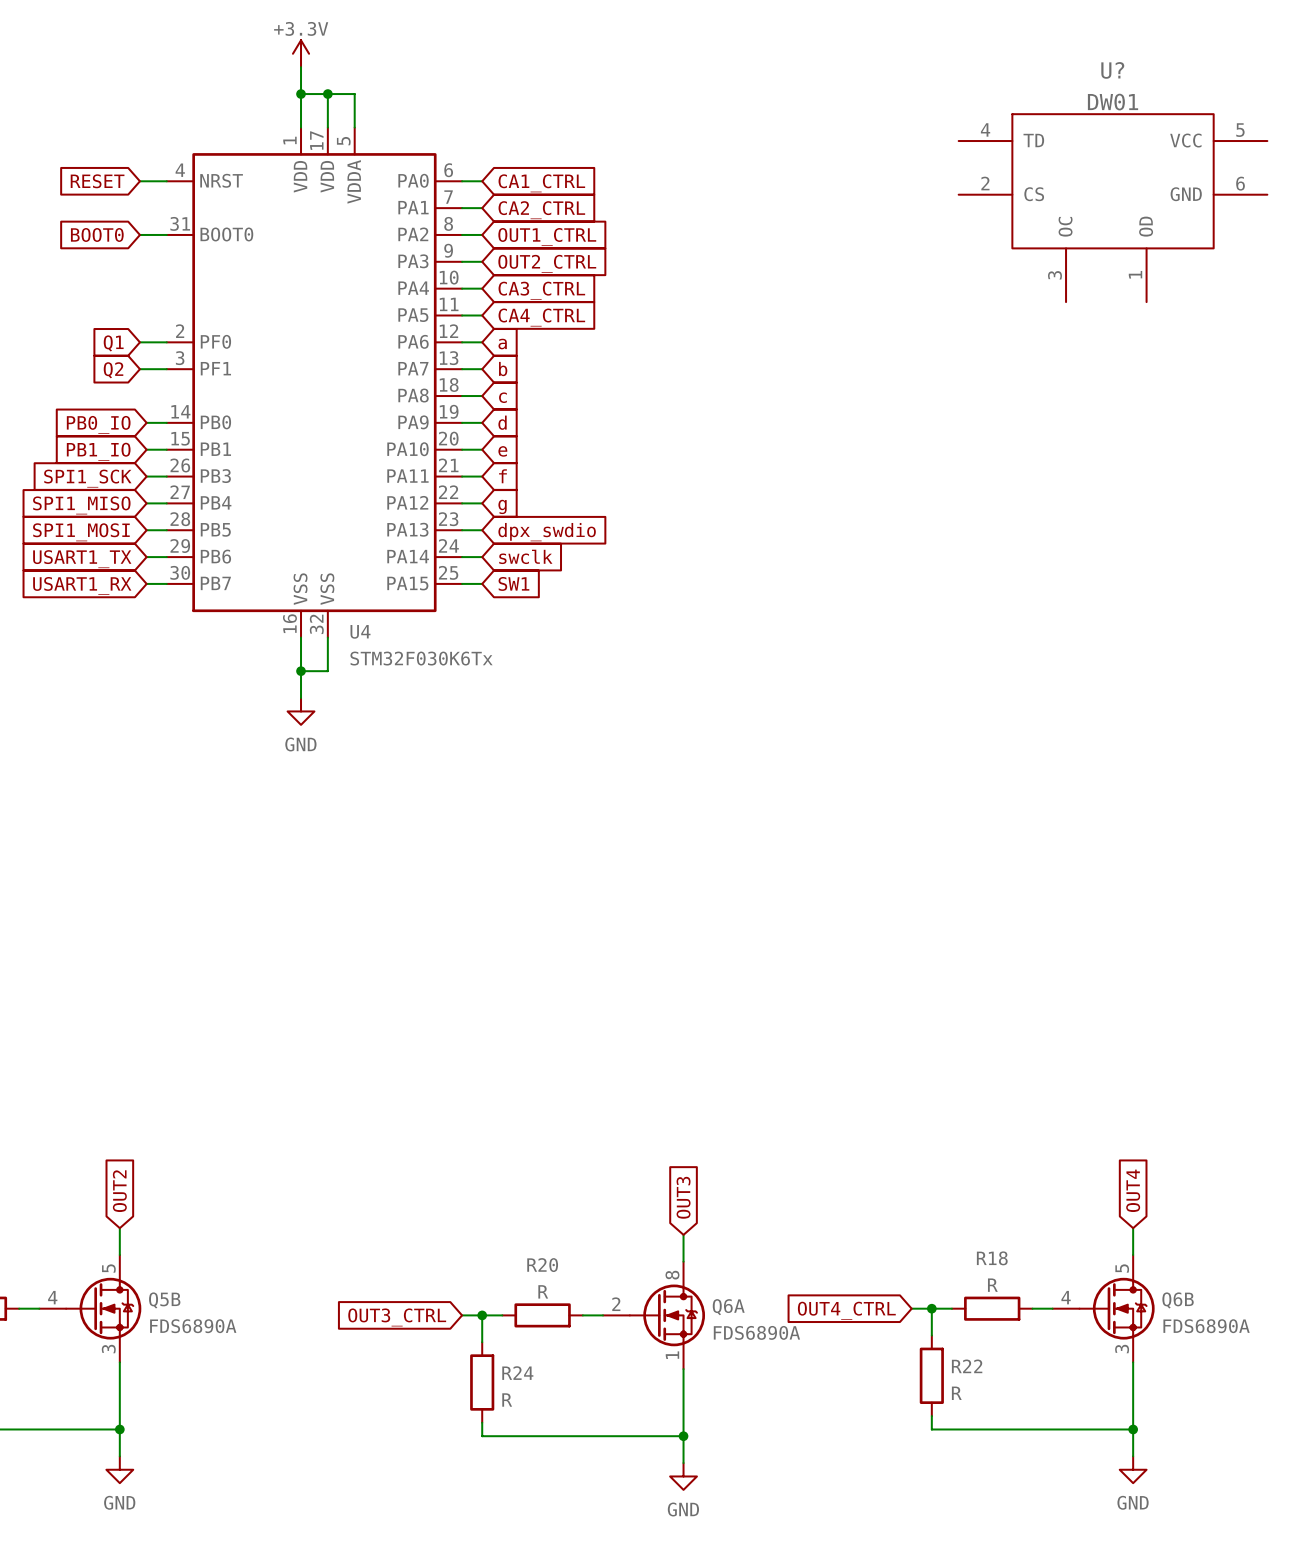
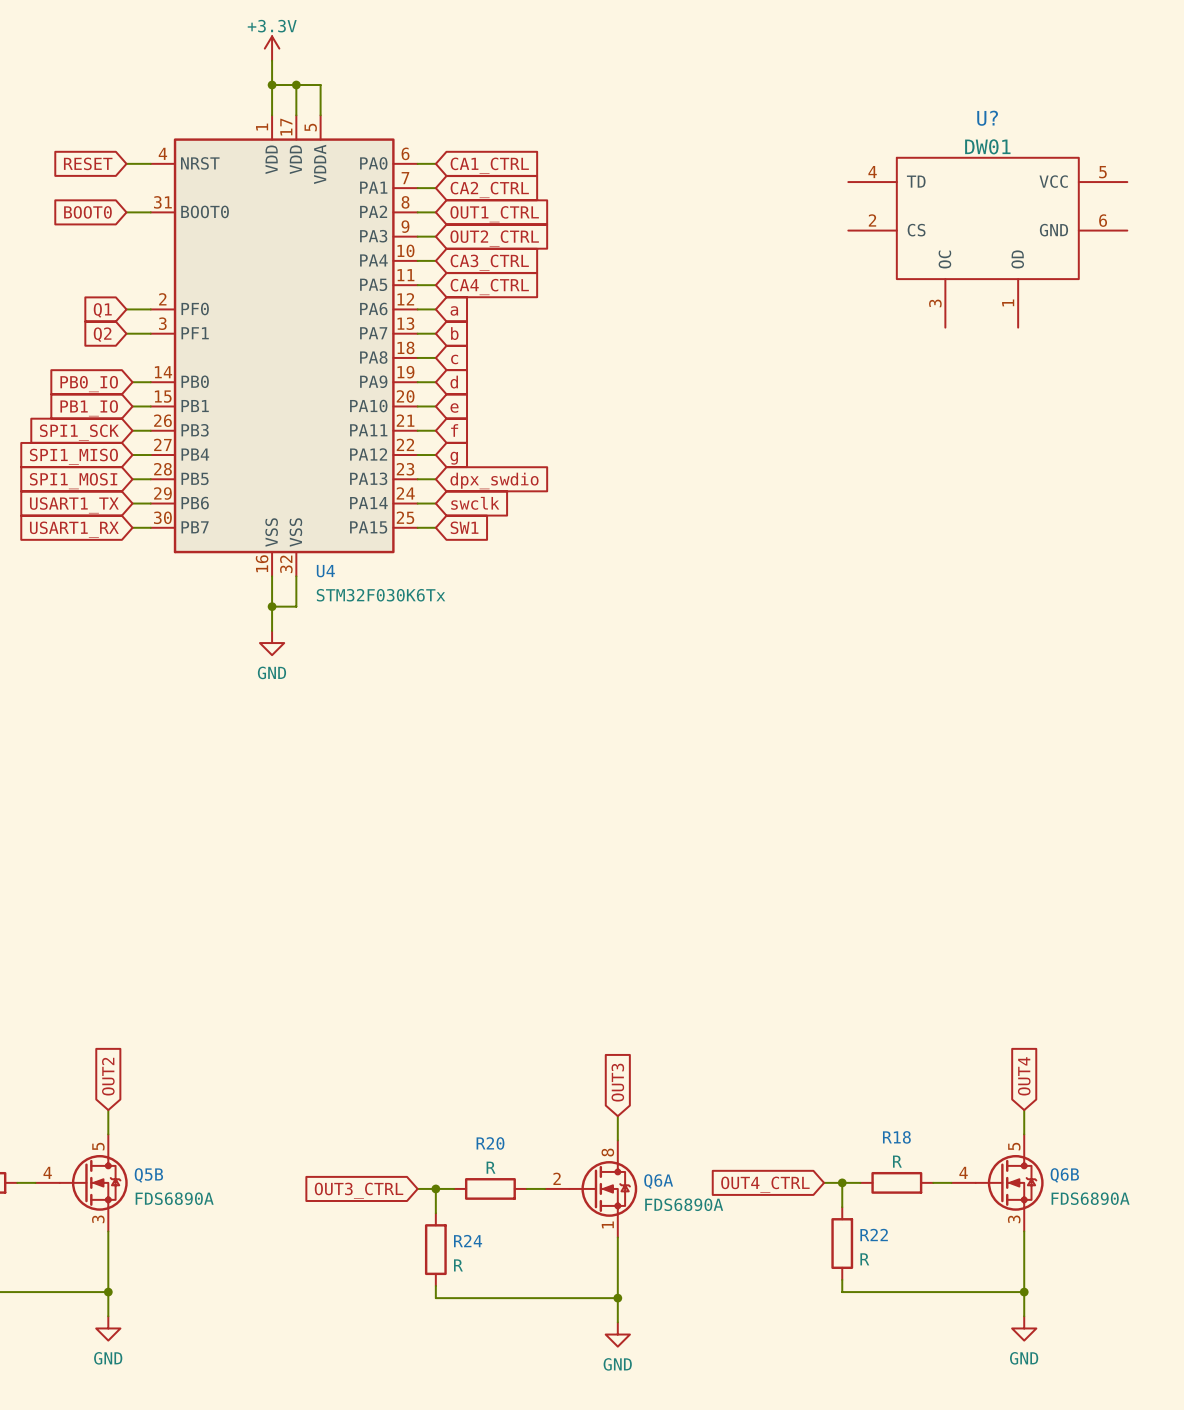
U? position: (1113, 208) -> (987, 242)

